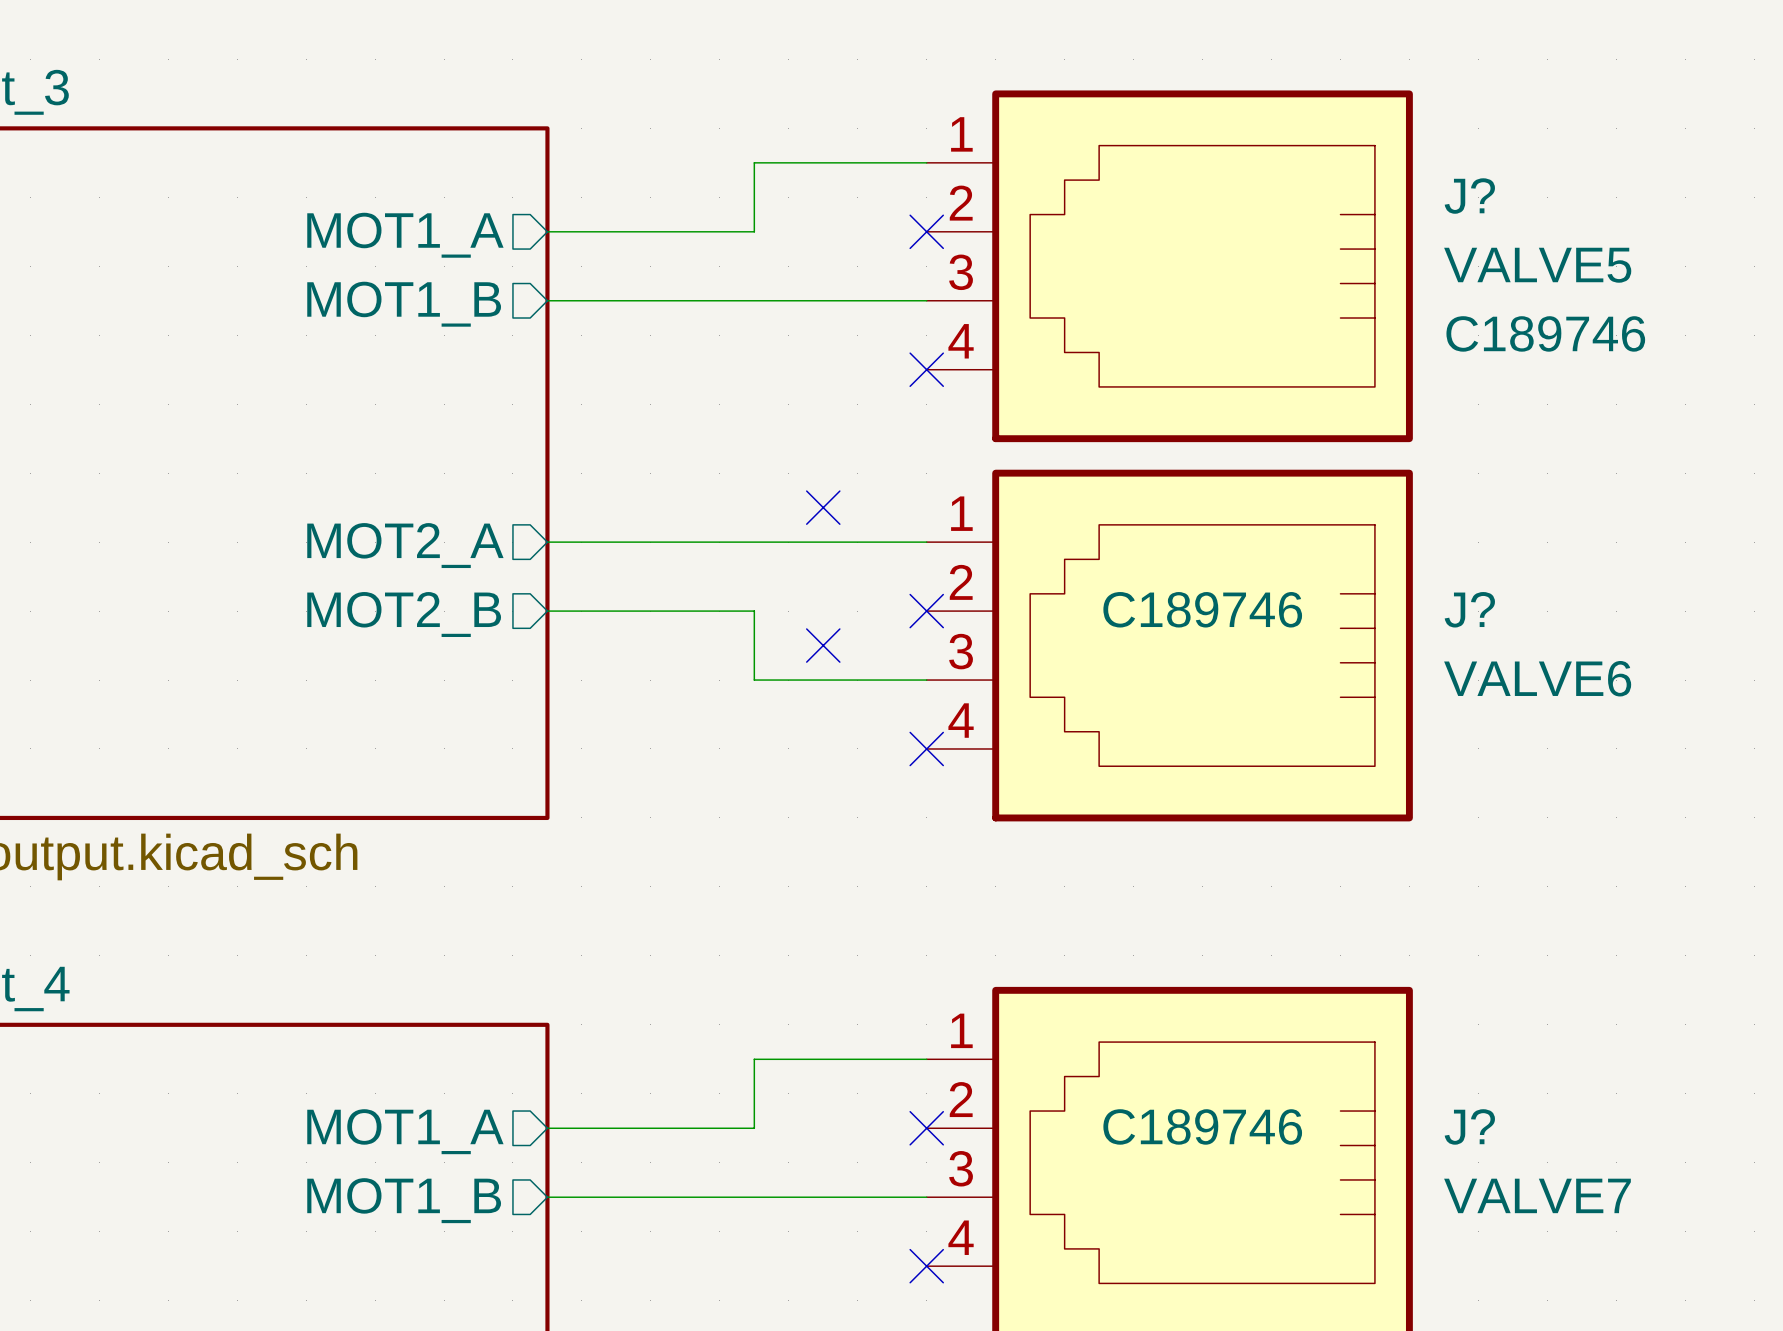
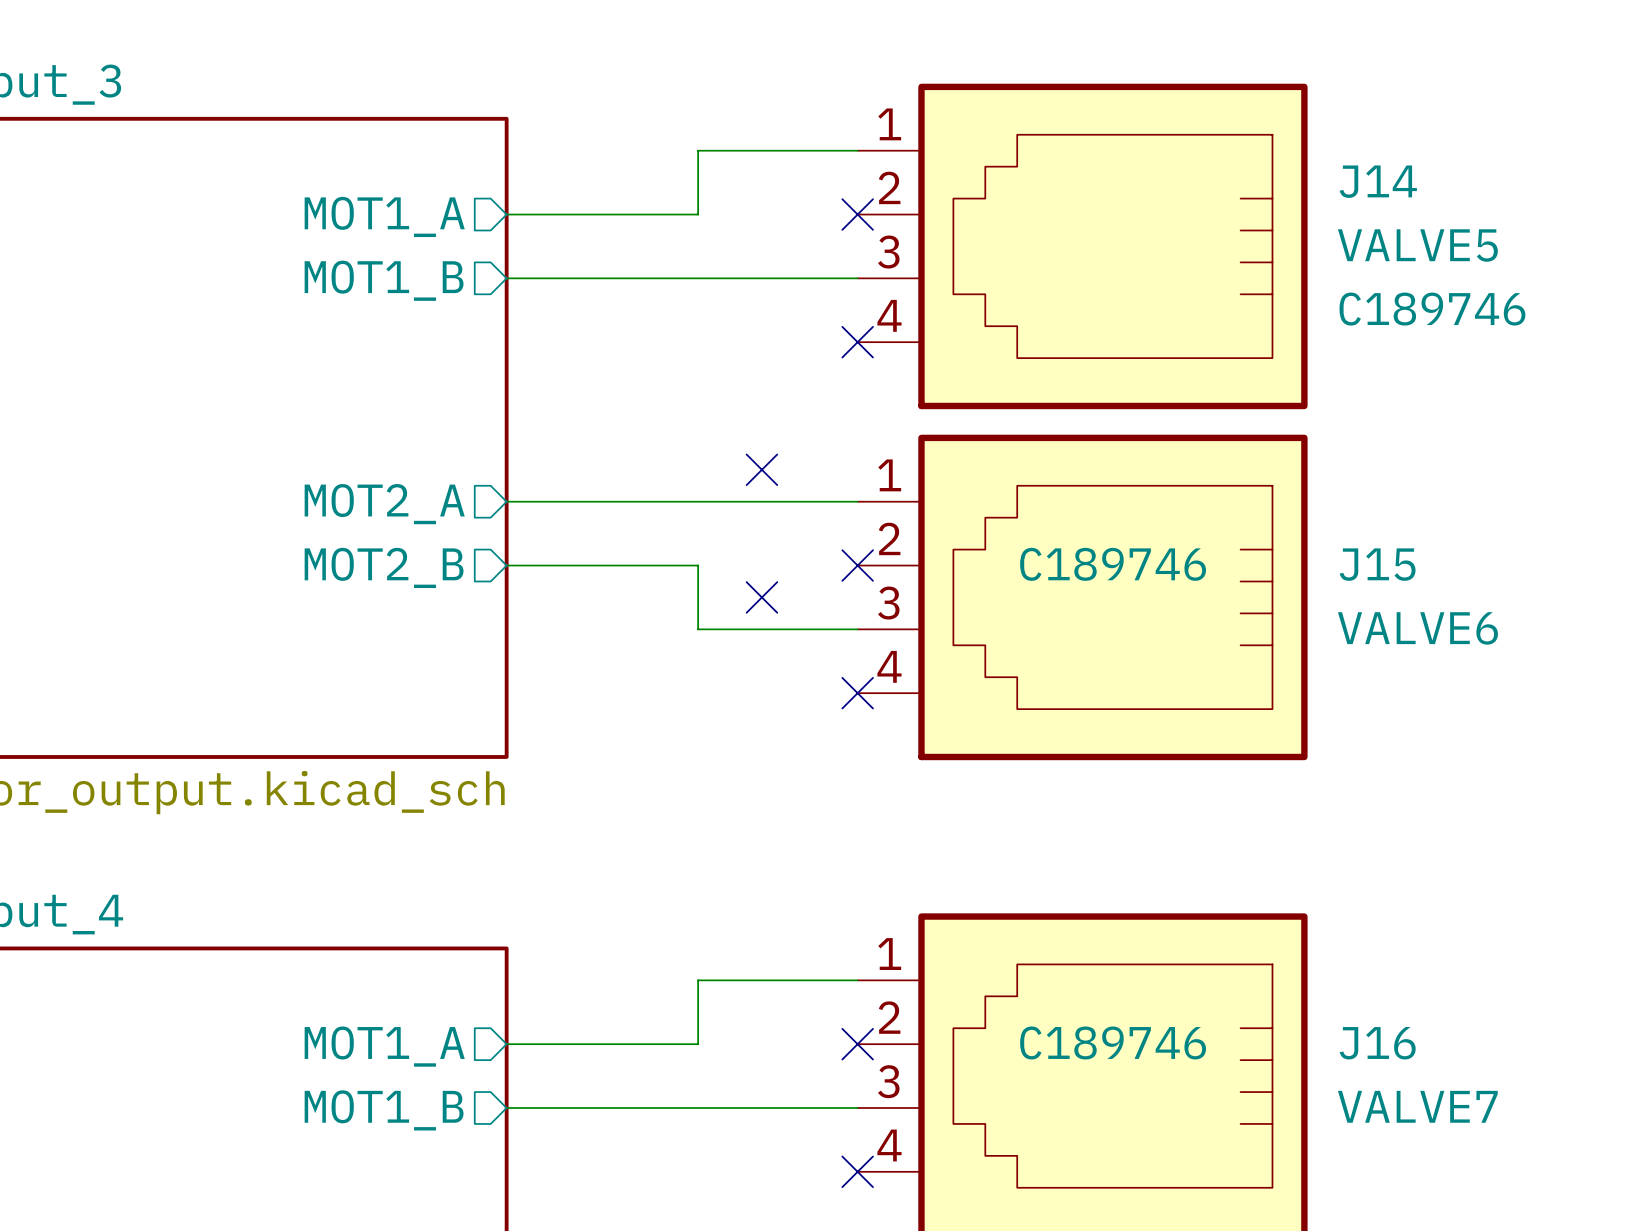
J? name: J? (1469, 196) -> J14 (1378, 181)
J? name: J? (1469, 609) -> J15 (1377, 564)
J? name: J? (1469, 1126) -> J16 (1377, 1043)

